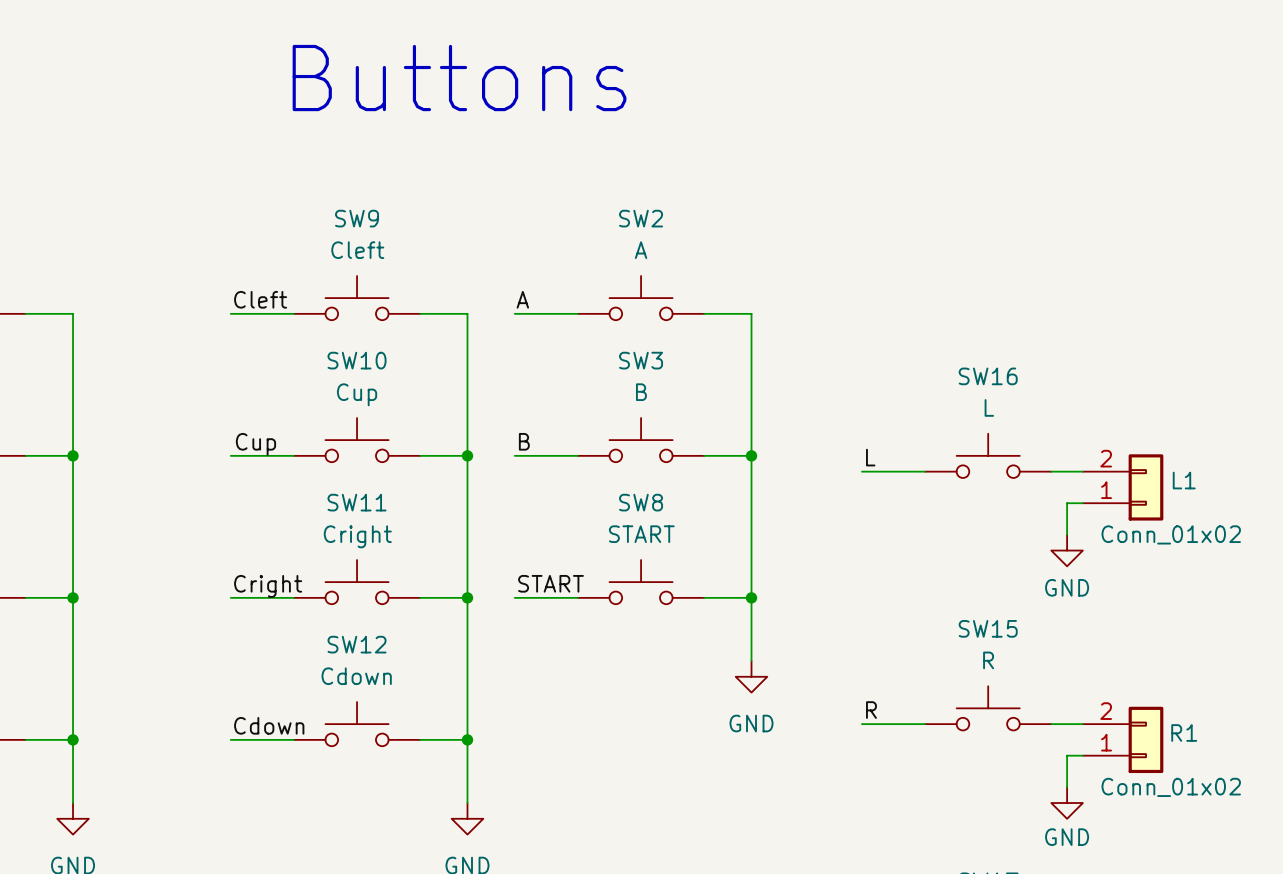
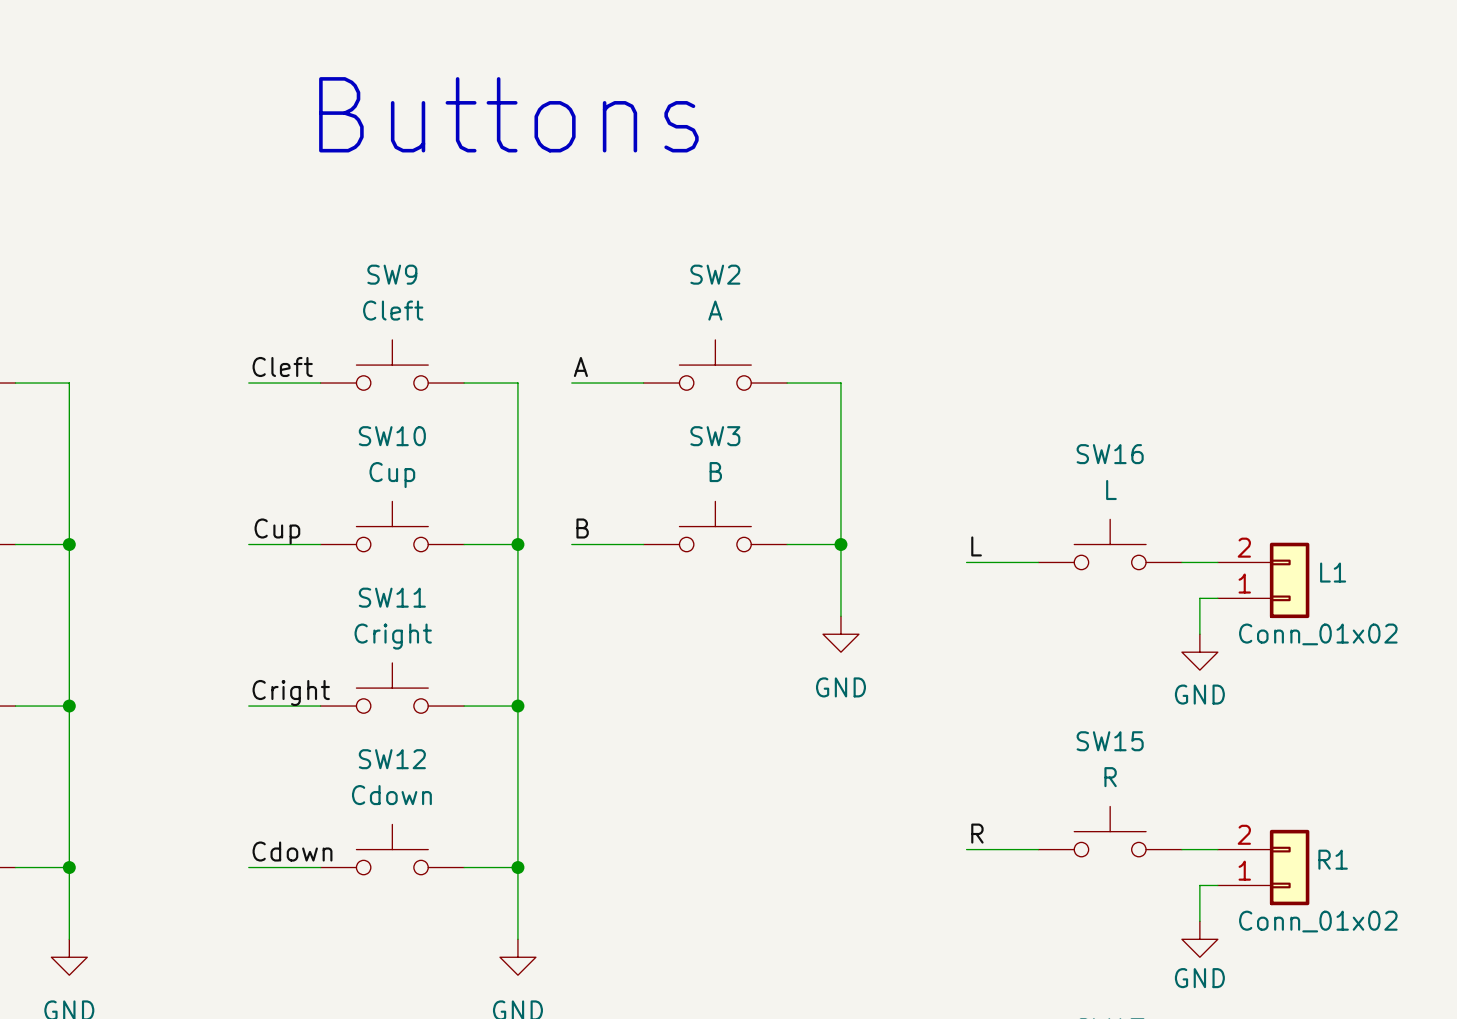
wire: (751, 518) (751, 661) -> none
SW8: START (641, 582) -> none
label: START (551, 583) -> none
wire: (514, 597) (577, 597) -> none
wire: (704, 597) (751, 597) -> none
junction: (751, 597) -> none
power symbol position: GND (751, 676) -> GND (840, 634)

